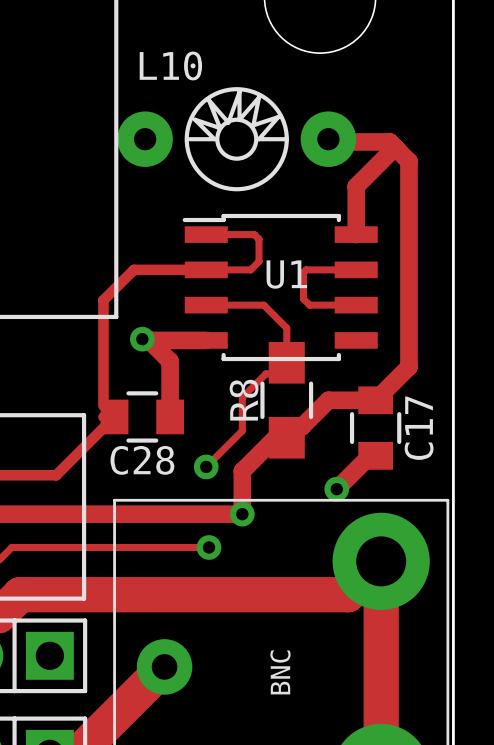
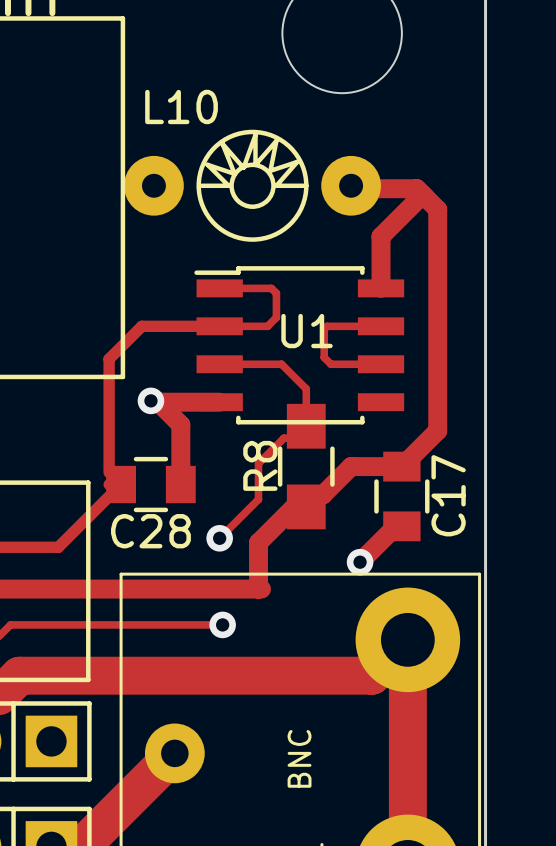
via: (242, 514) -> none

